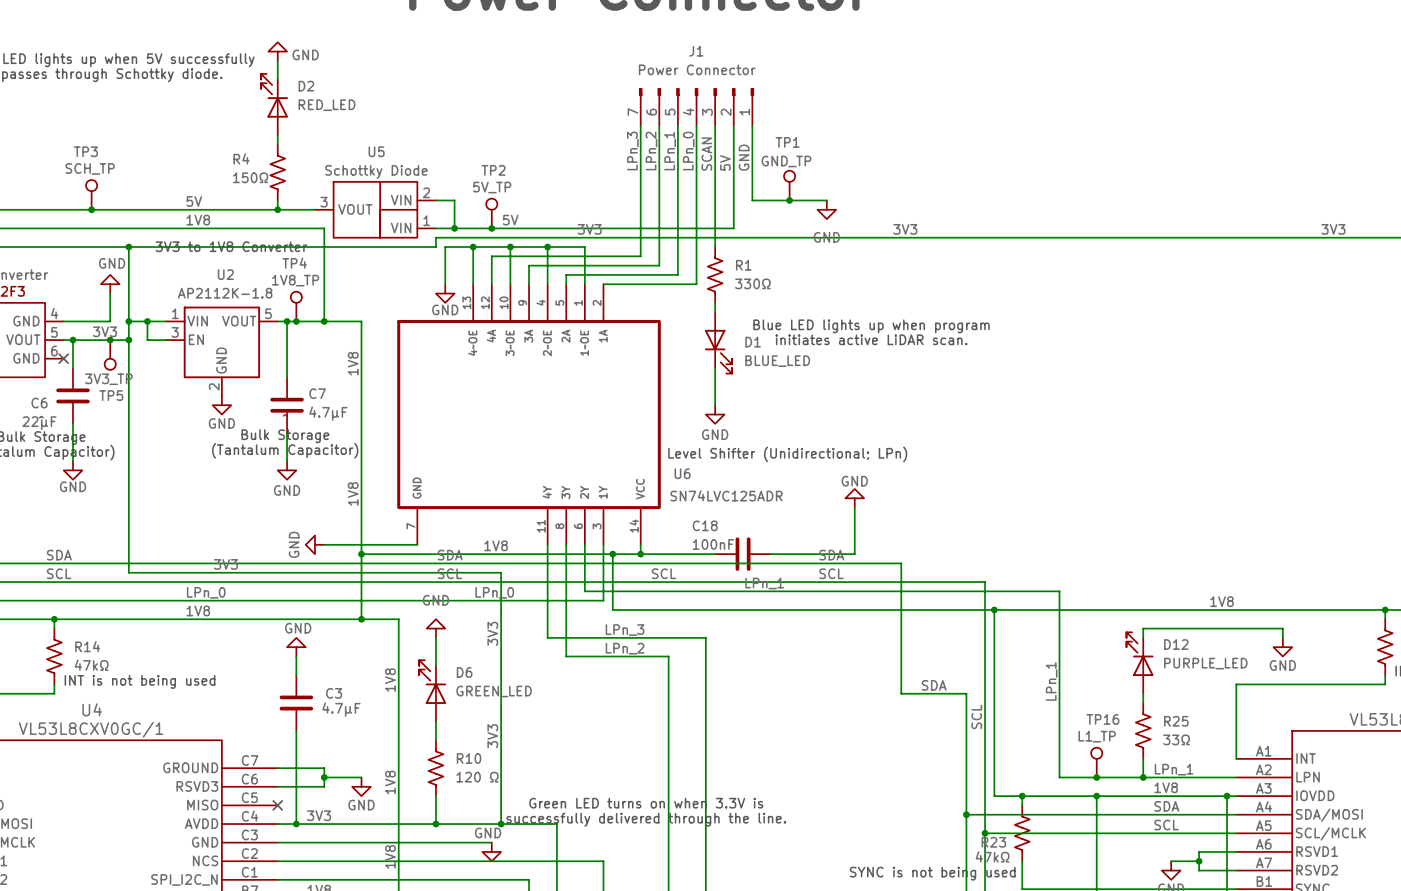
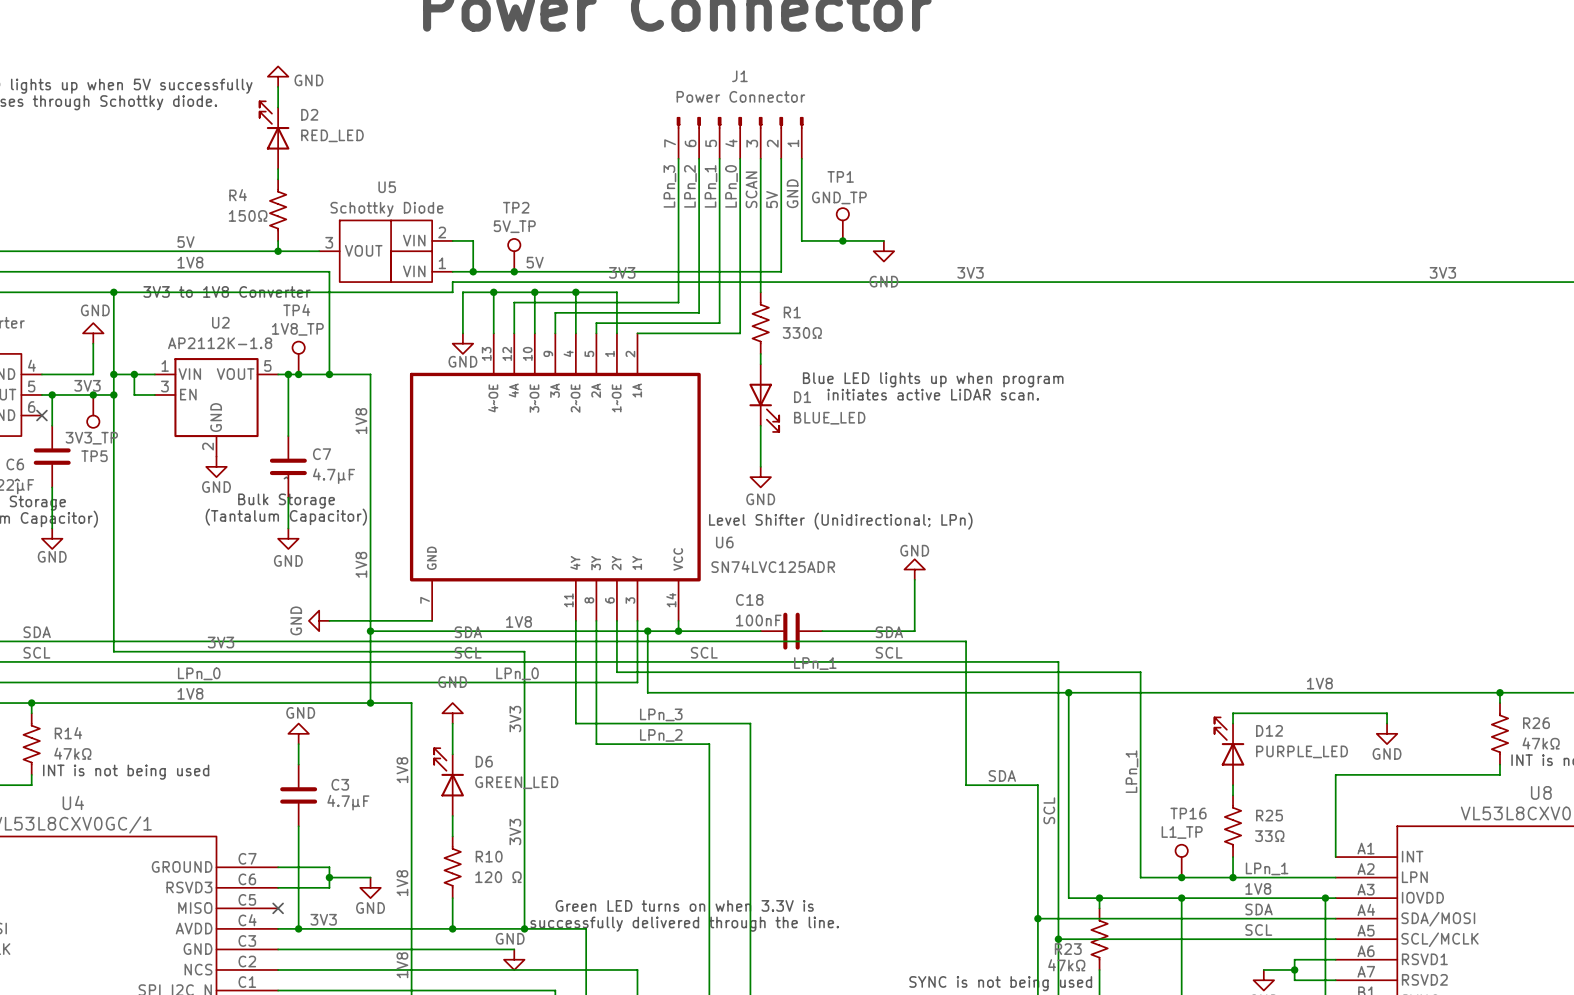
TP3: SCH_TP (91, 194) -> none
junction: (91, 209) -> none

